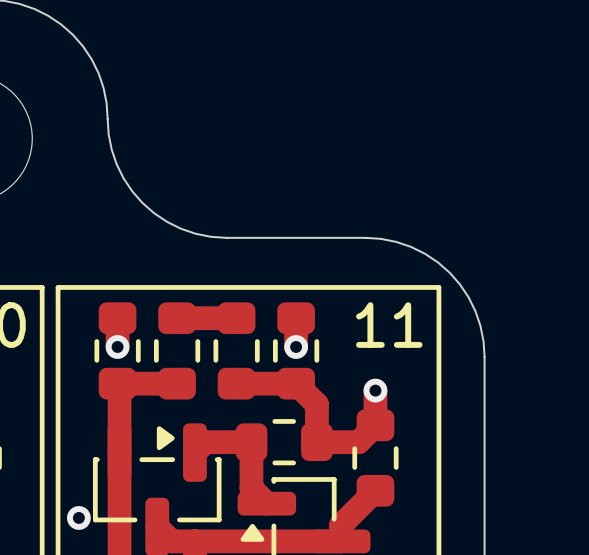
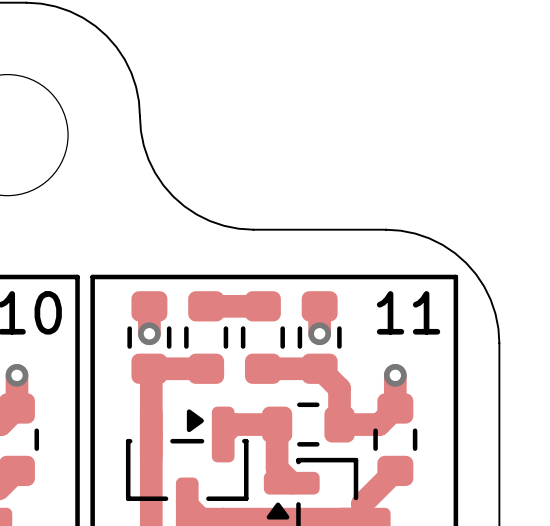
via: (78, 517) -> none

